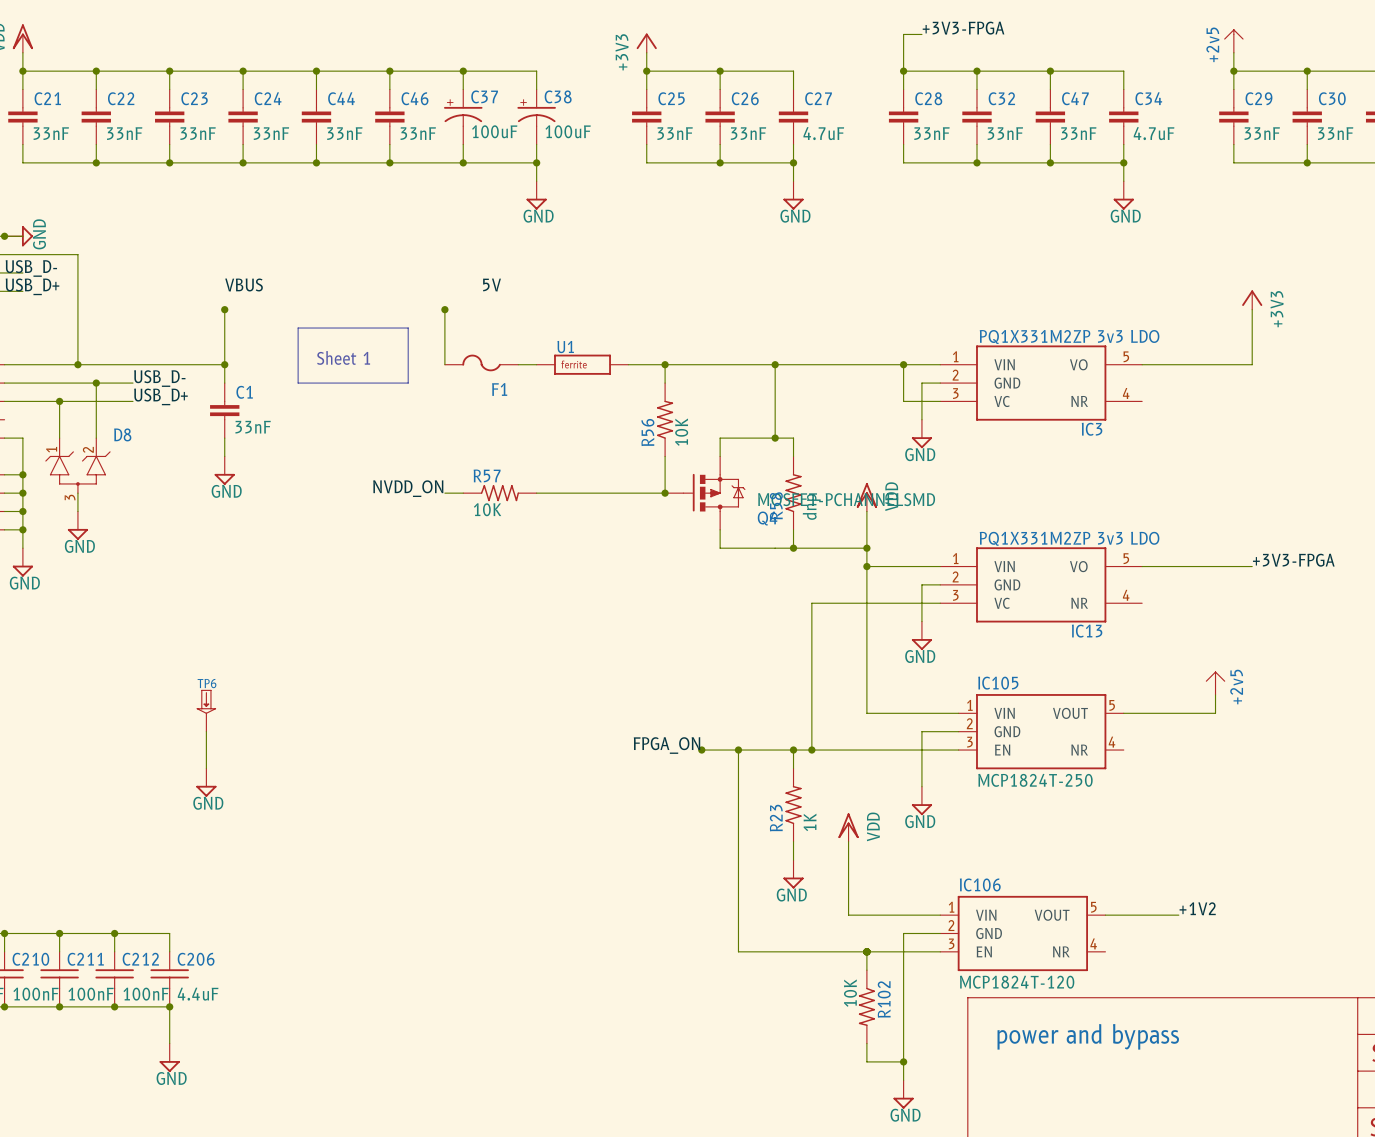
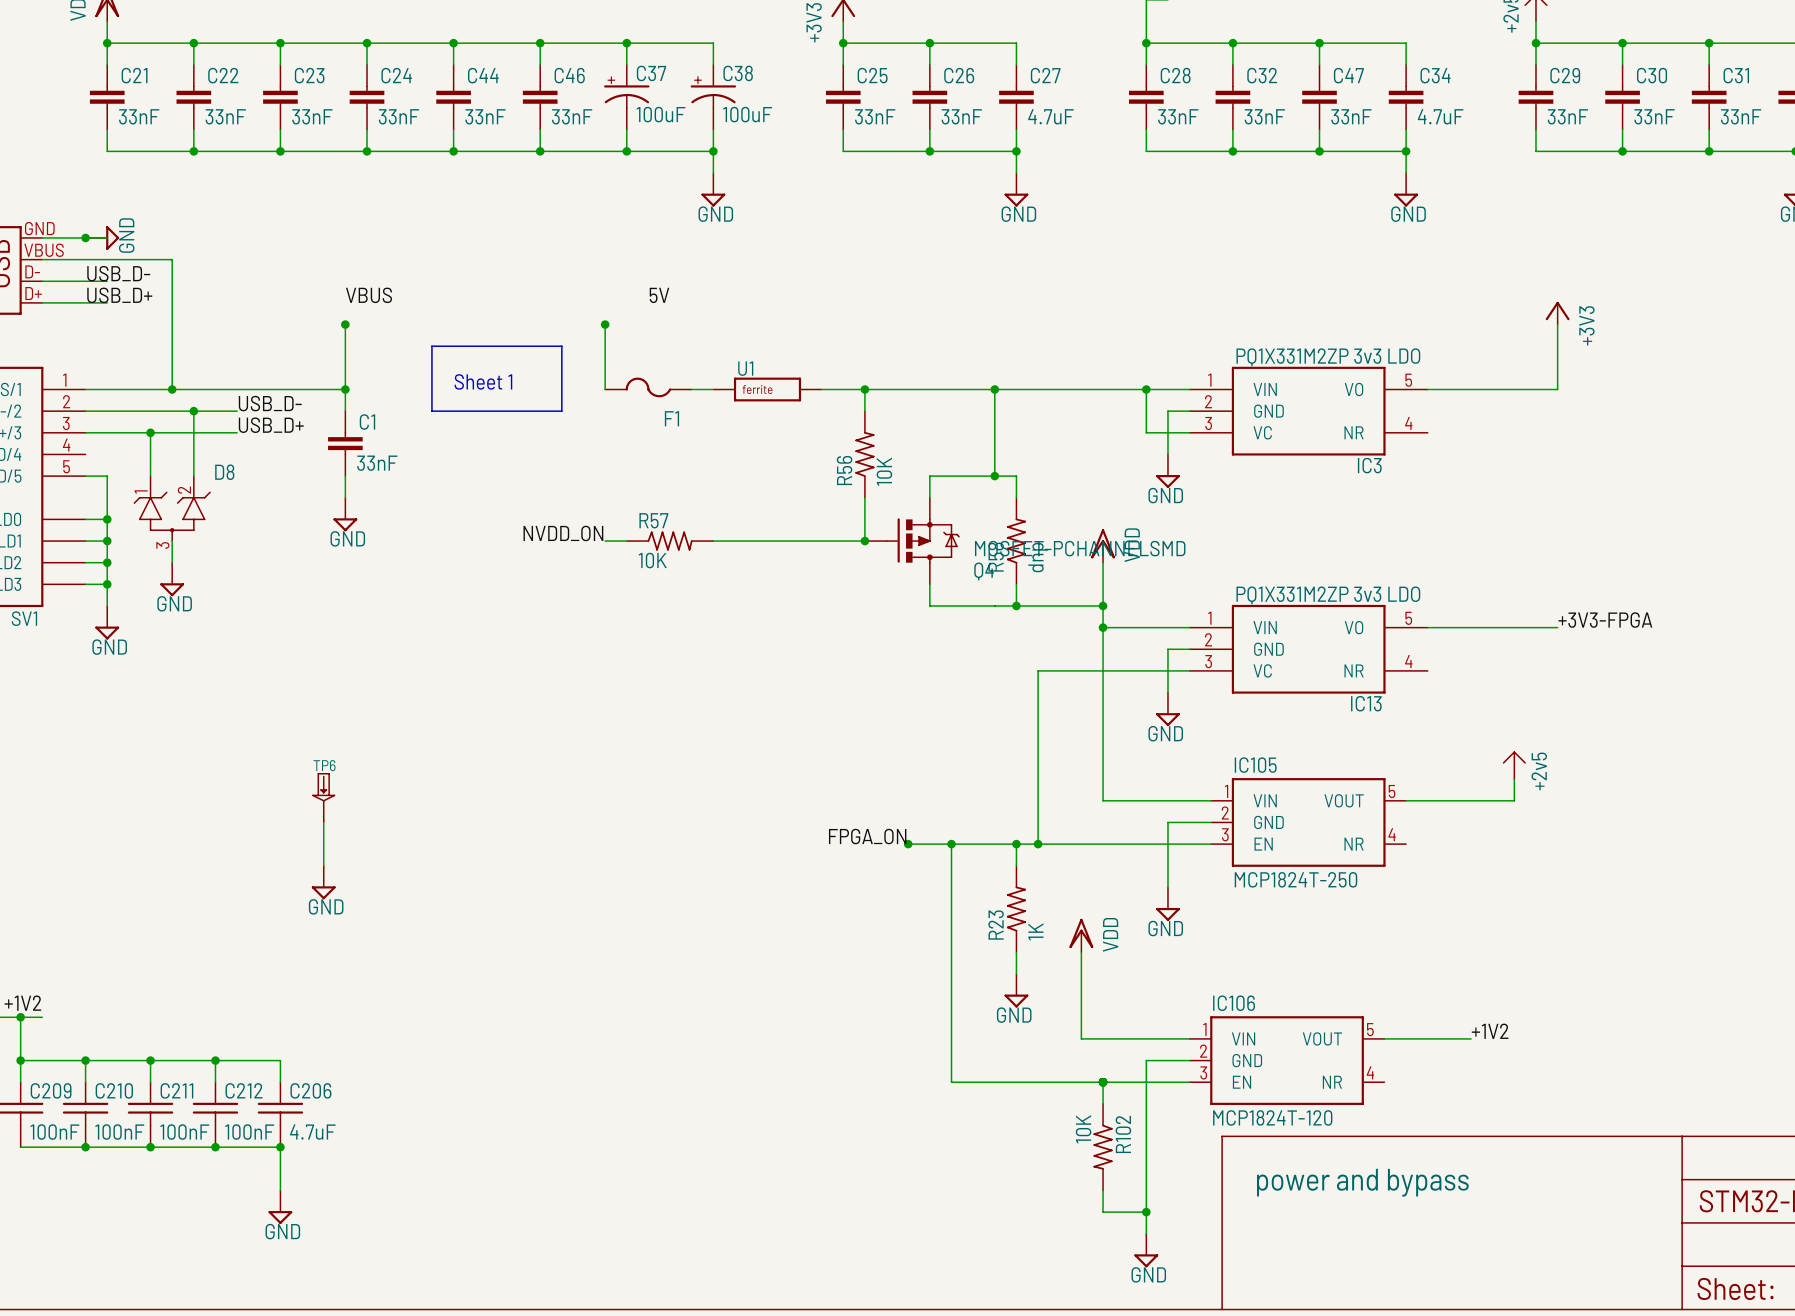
C206 value: 4.4uF (198, 994) -> 4.7uF (312, 1132)

